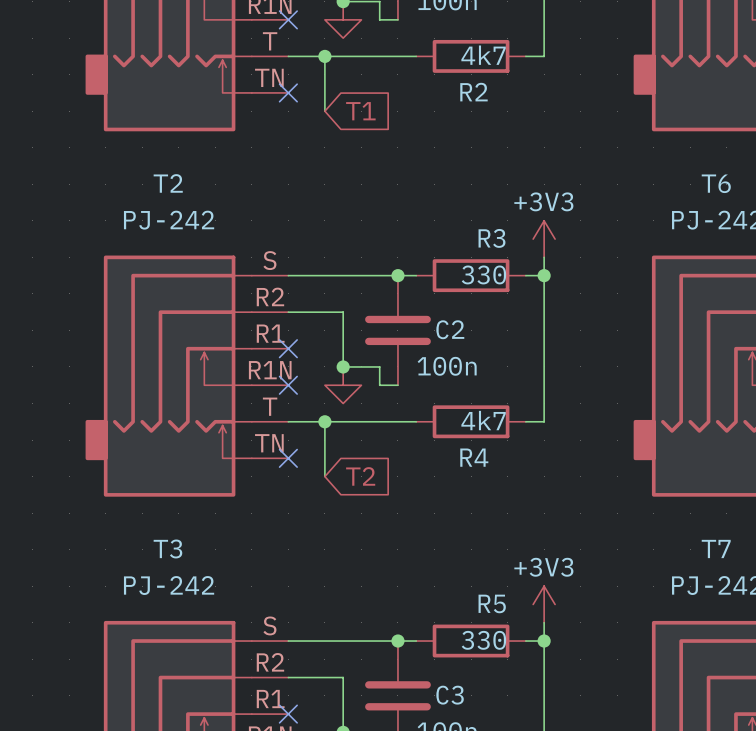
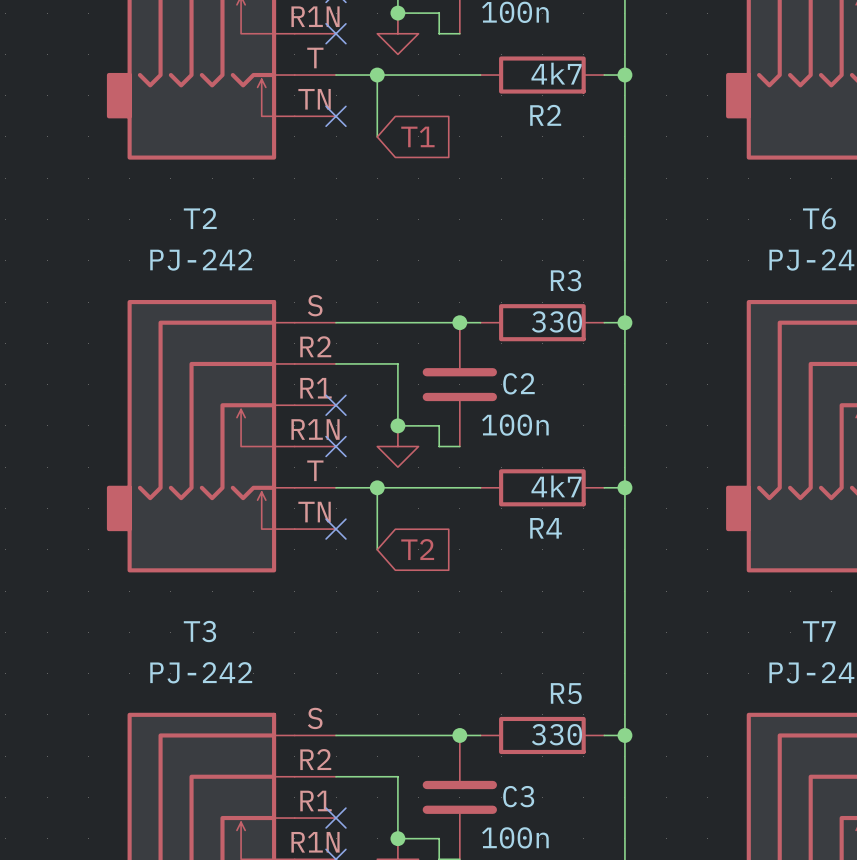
wire: none -> (624, 75) (624, 302)
junction: none -> (624, 75)
power symbol: +3V3 (544, 239) -> none
wire: none -> (624, 487) (624, 714)
junction: none -> (624, 487)
power symbol: +3V3 (544, 604) -> none

